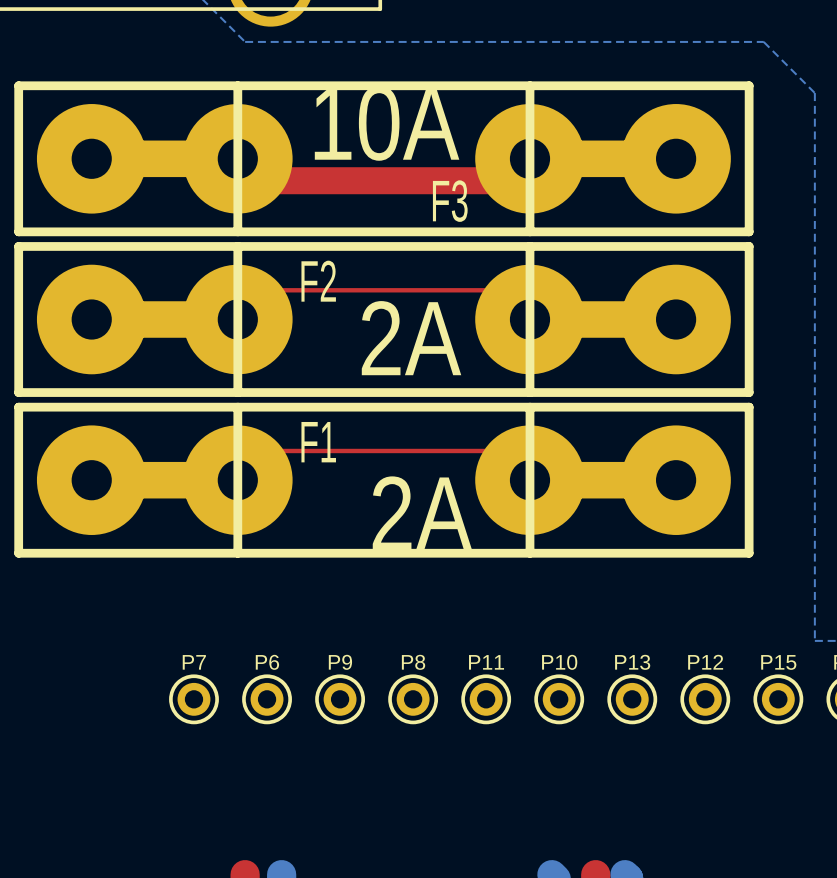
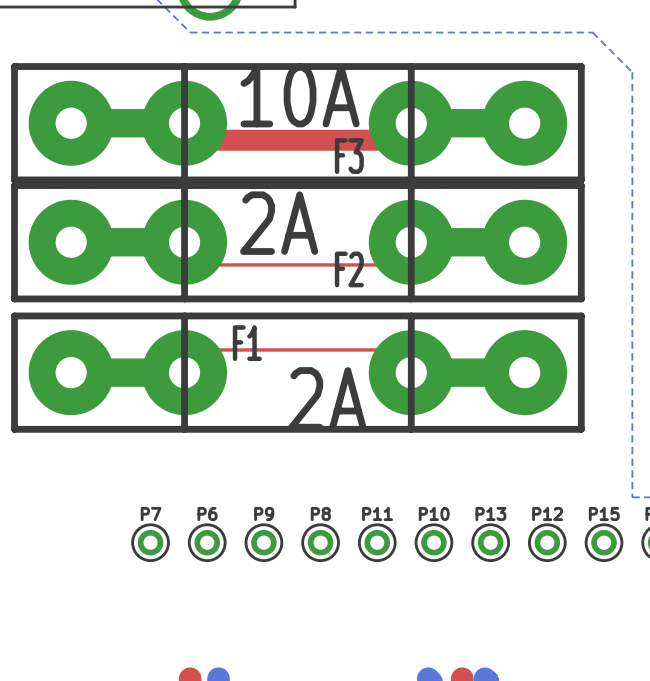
F2 rotation: 0° (383, 319) -> 180° (297, 242)

